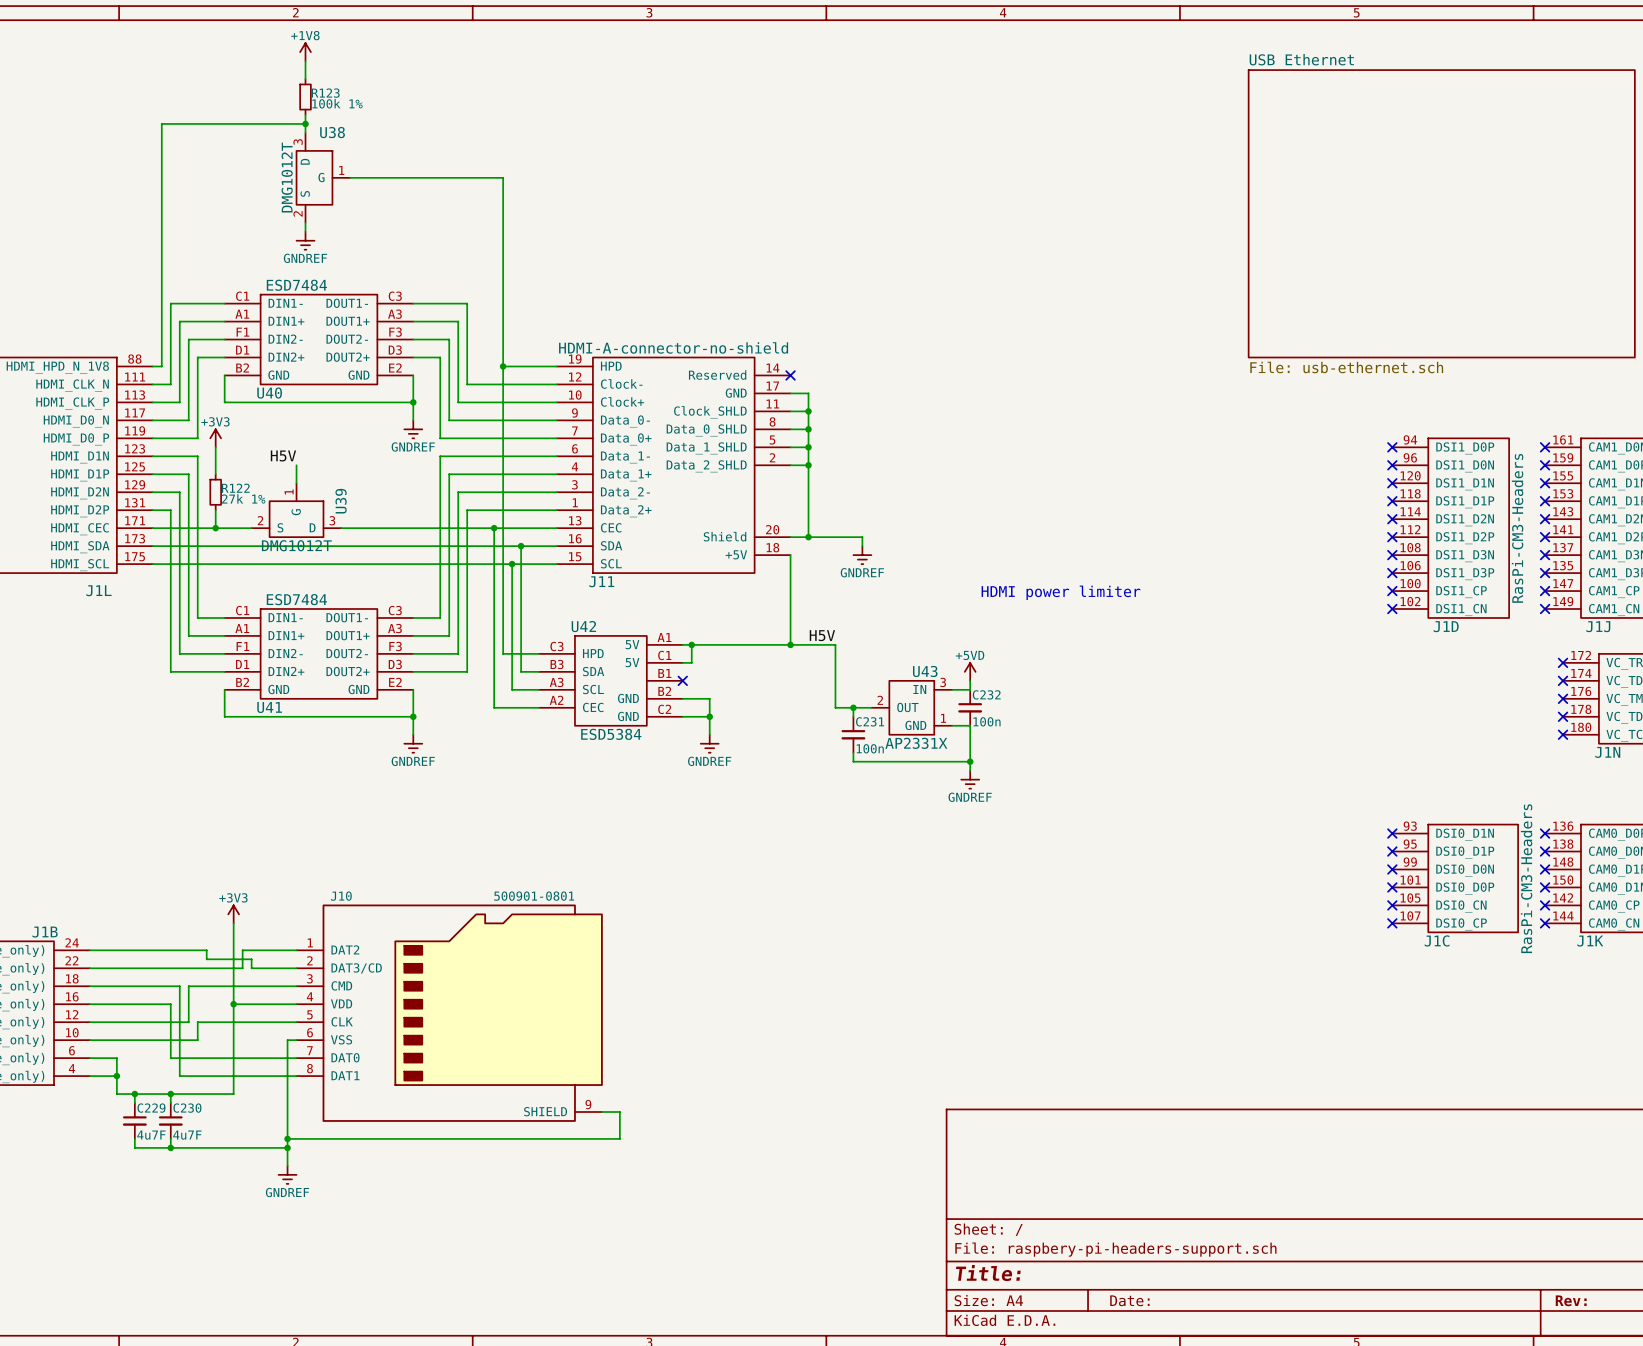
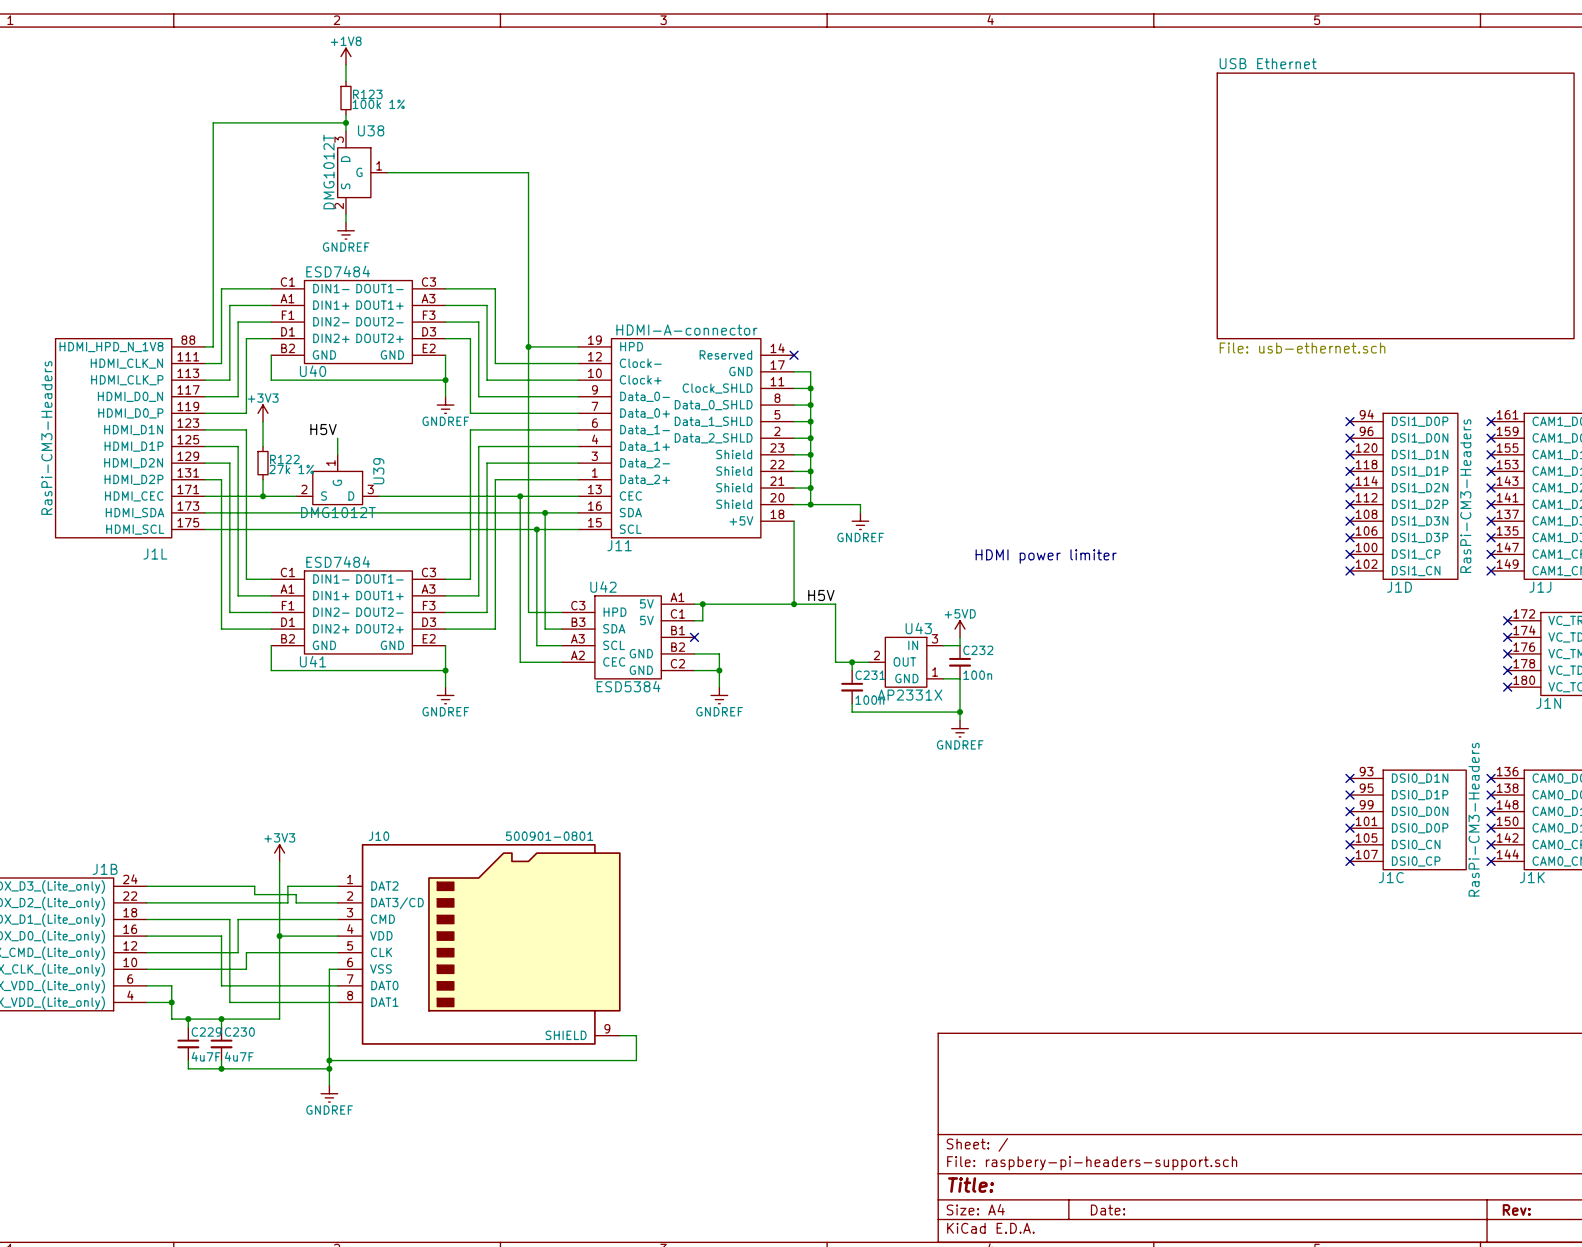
J11 value: HDMI-A-connector-no-shield (673, 347) -> HDMI-A-connector (686, 329)
J11 symbol: [557, 357, 791, 574] -> [578, 338, 795, 538]
wire: none -> (794, 454) (810, 454)
junction: none -> (810, 454)
wire: none -> (794, 471) (810, 471)
junction: none -> (810, 471)
wire: none -> (794, 488) (810, 488)
junction: none -> (810, 488)

